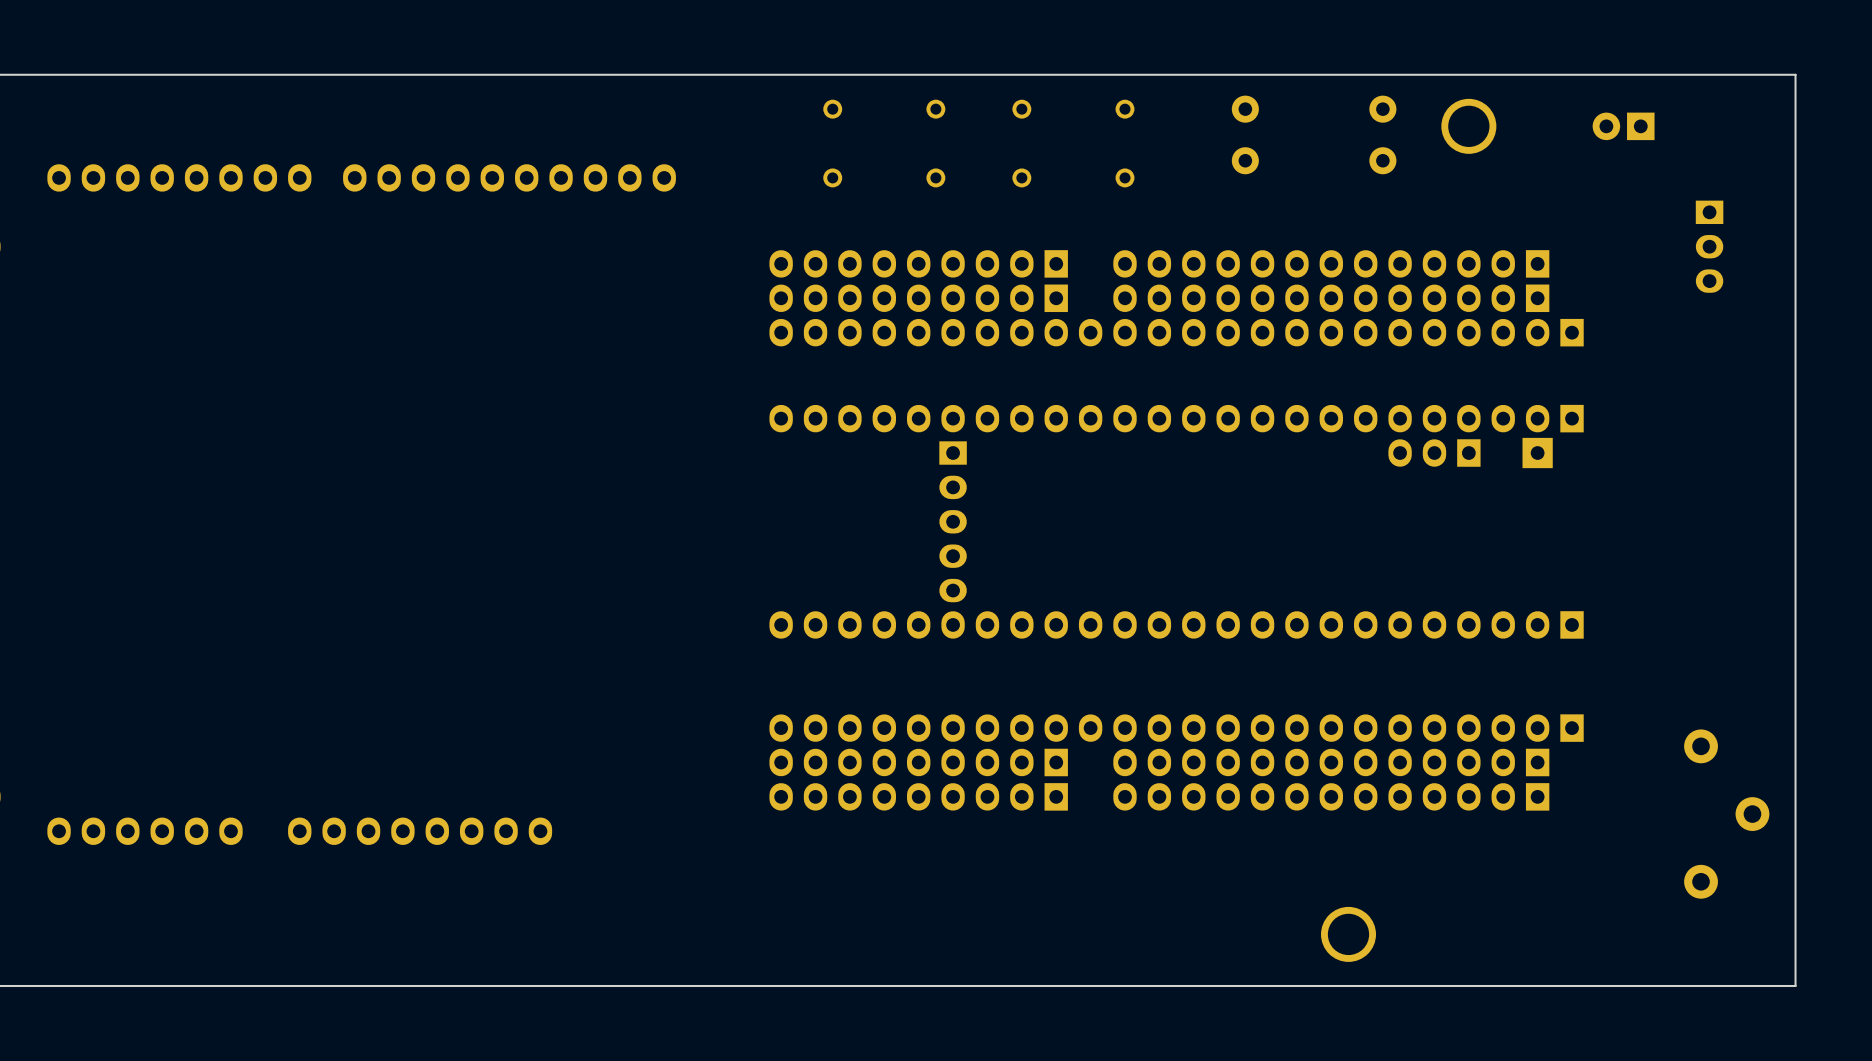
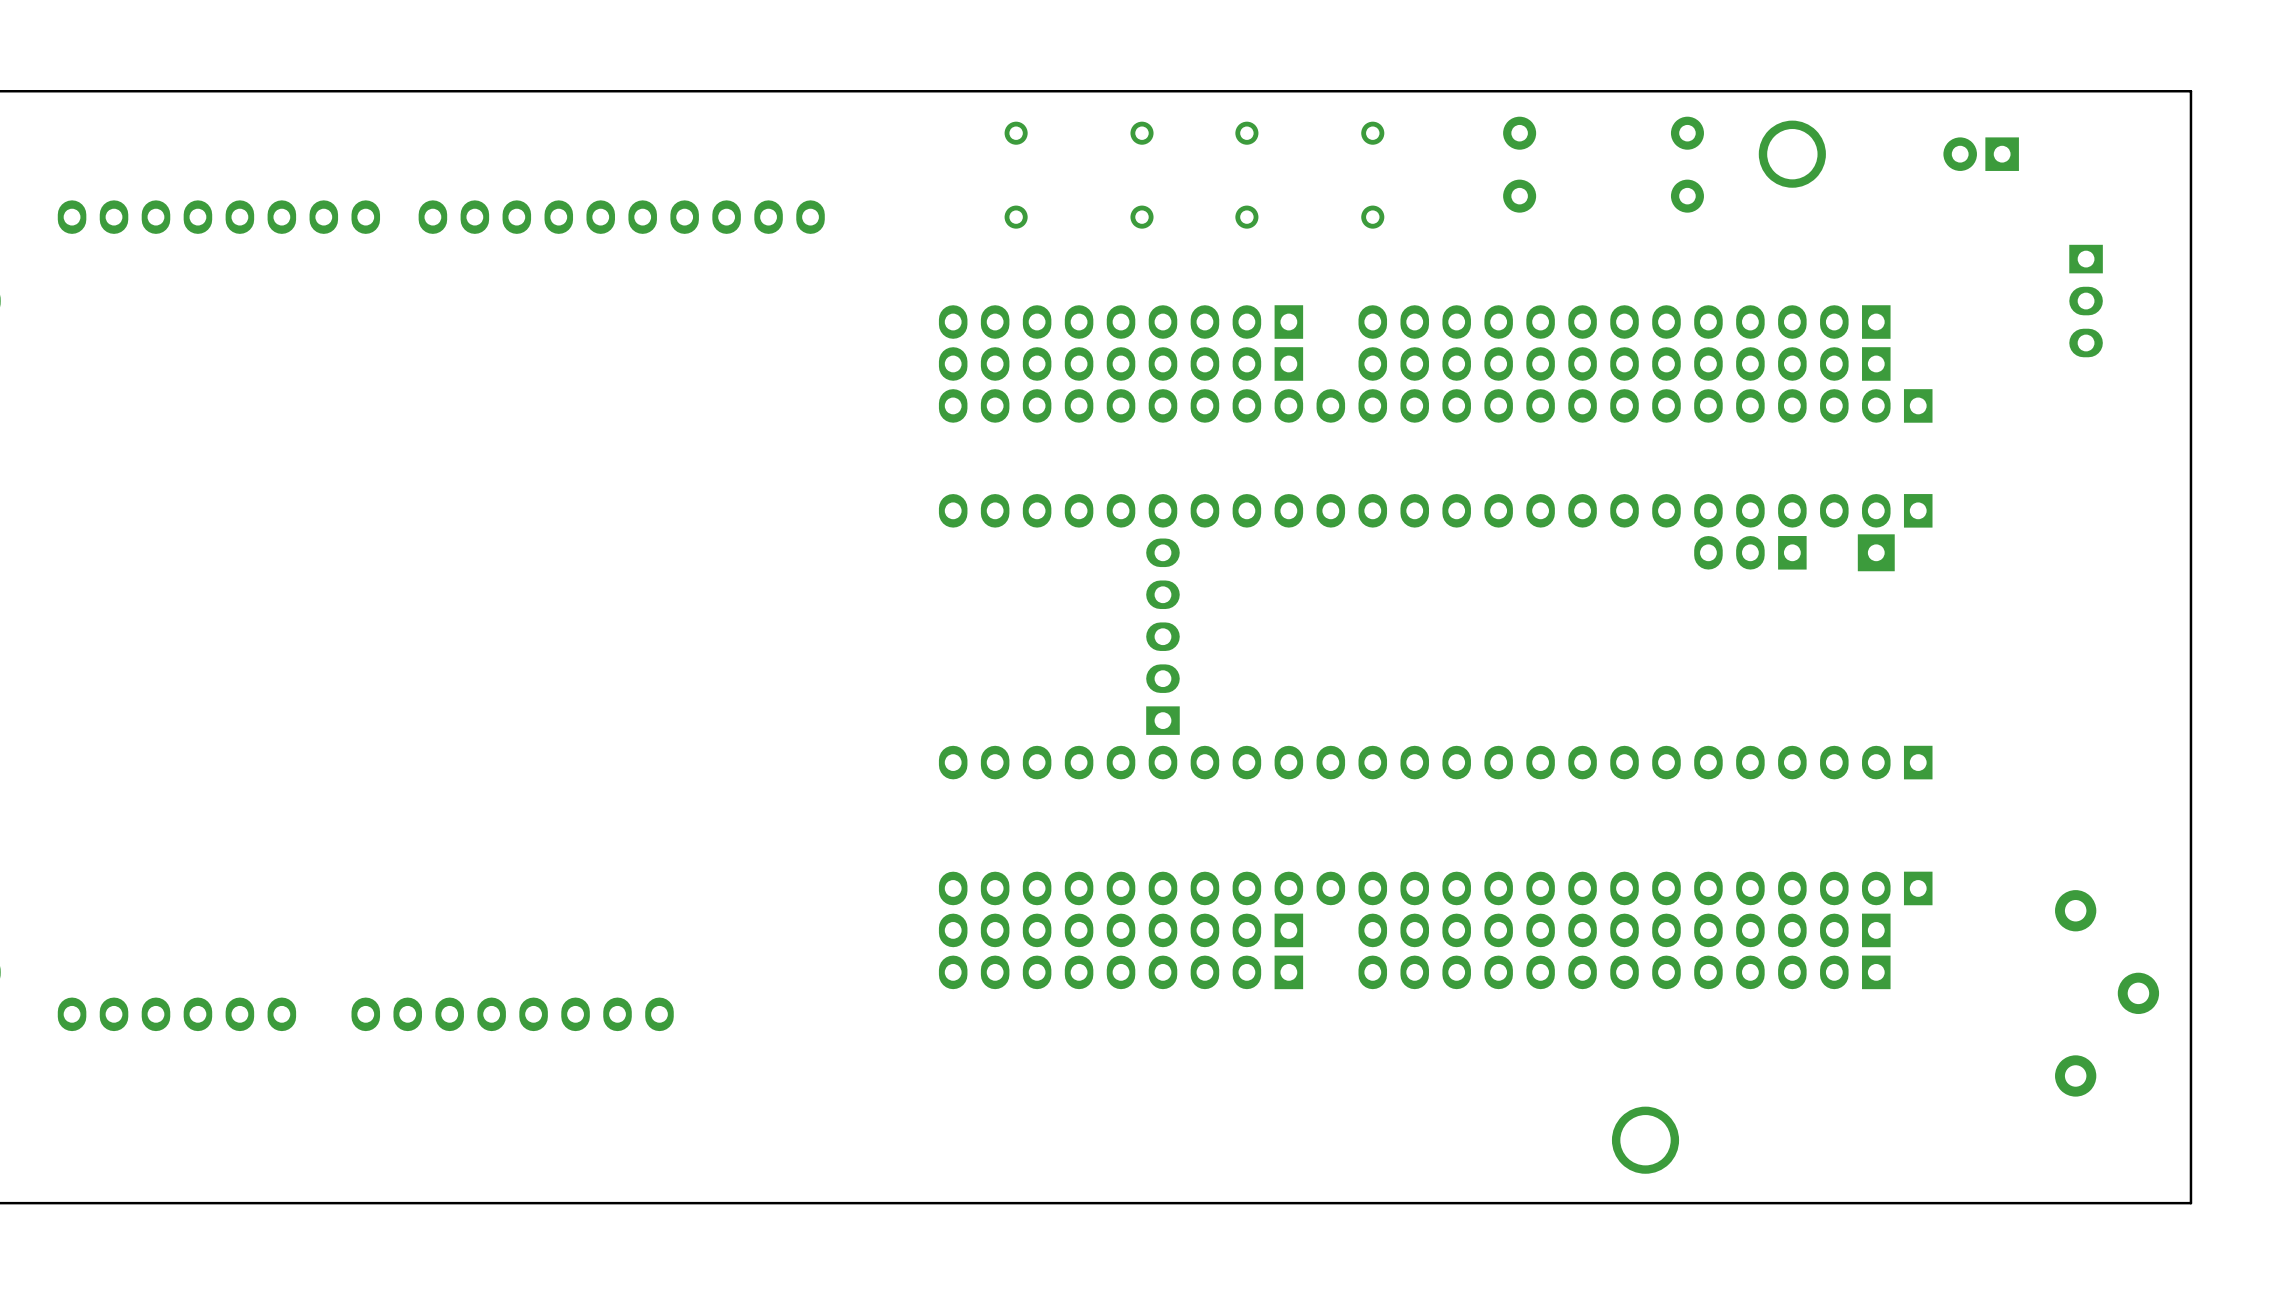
part rotation: 0° (953, 521) -> 180° (1162, 636)

